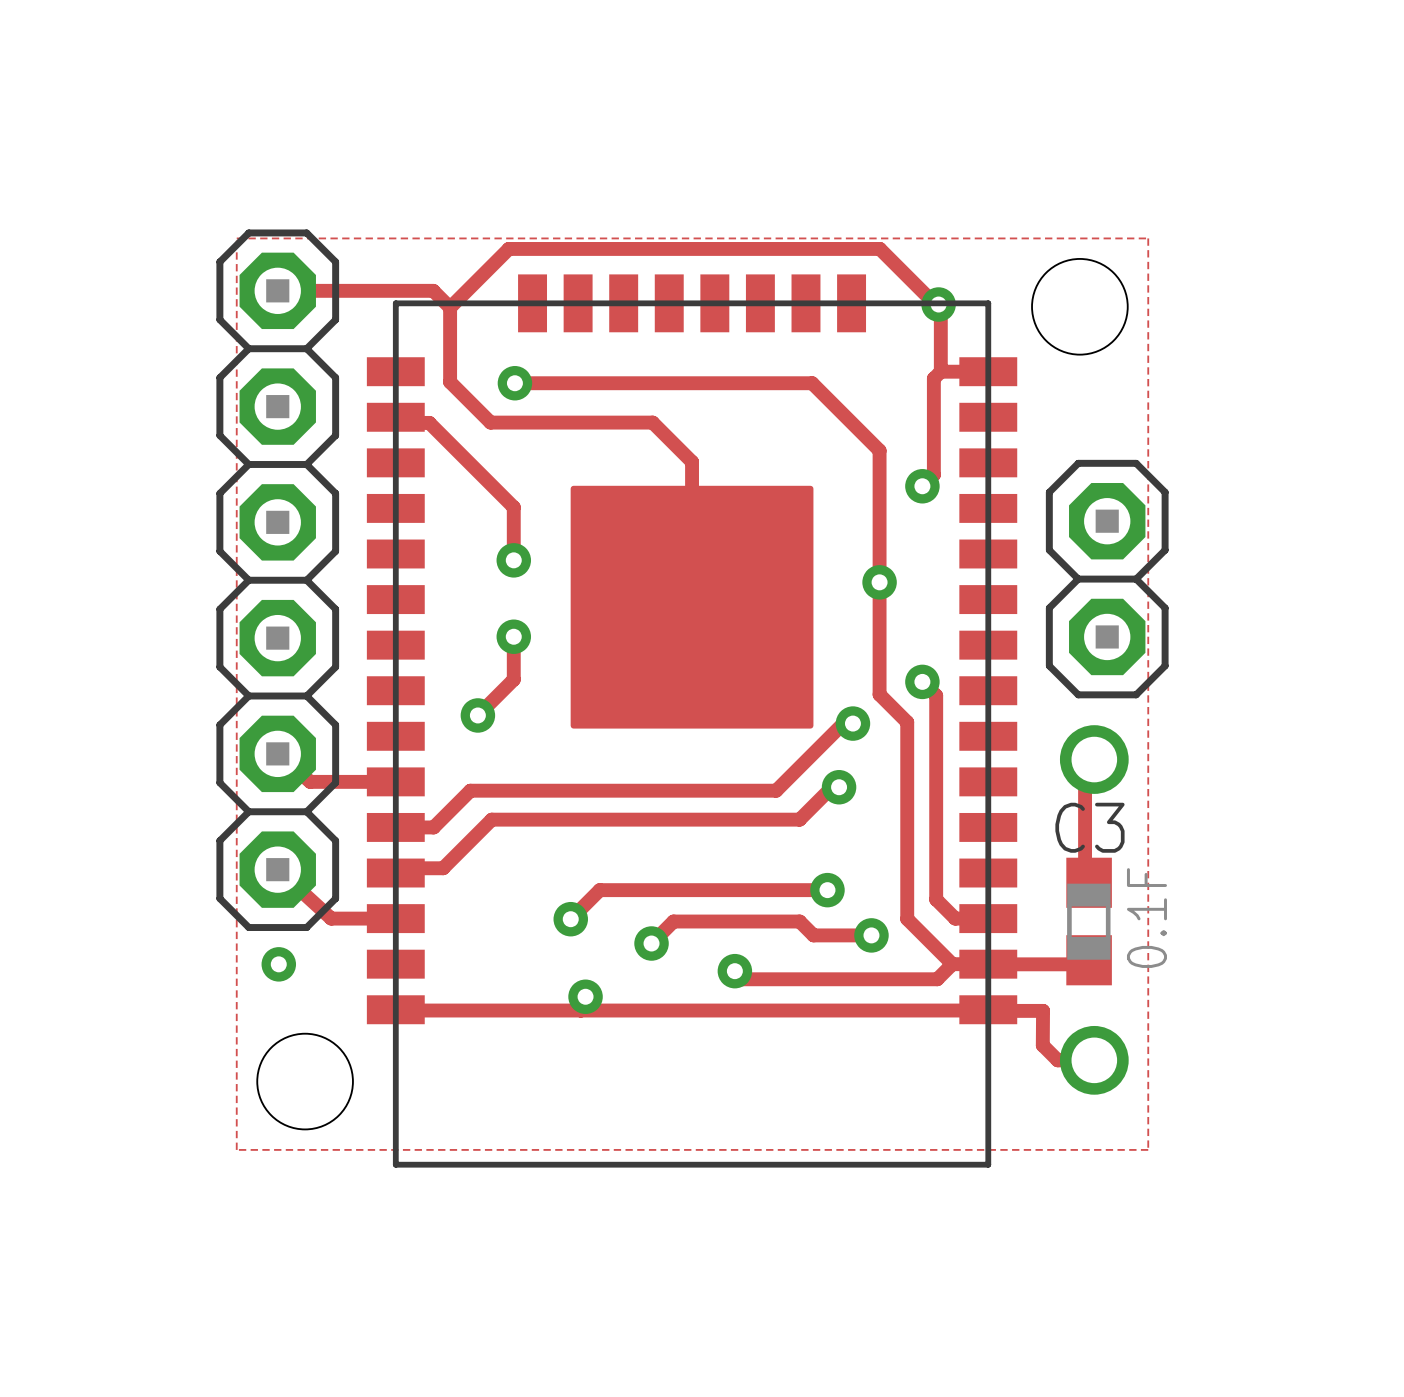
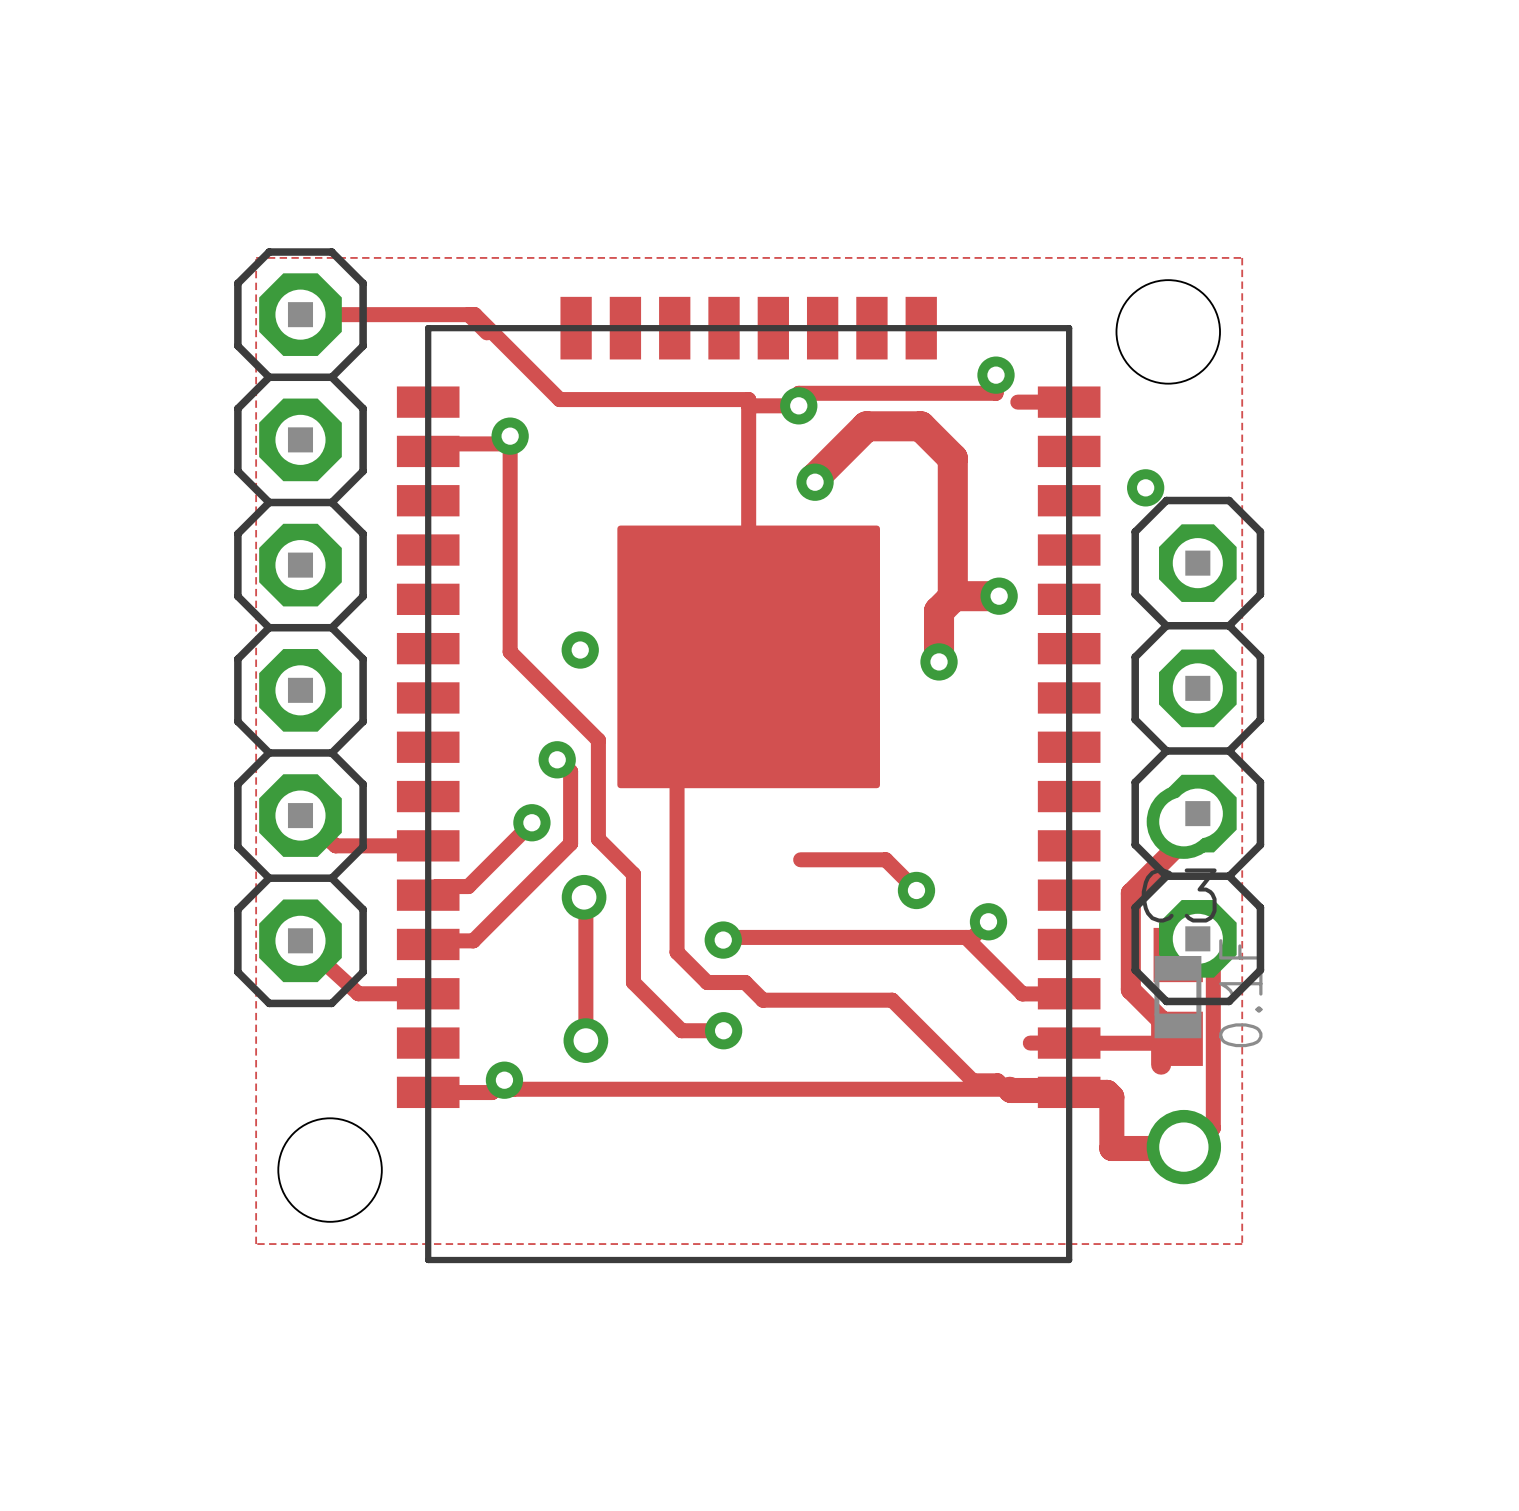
via position: (938, 304) -> (996, 375)
track: none -> (996, 375) (996, 393) (798, 393) (798, 405) (748, 405)
via: none -> (798, 405)
track: (514, 383) (812, 383) (879, 450) (879, 694) (907, 722) (907, 919) (952, 964) (937, 979) (742, 979) (734, 971) -> none
via position: (514, 383) -> (510, 436)
track: (395, 417) (401, 423) (429, 422) (513, 507) (513, 560) -> (428, 451) (435, 443) (502, 443) (510, 436) (510, 651) (598, 740) (598, 839) (633, 874) (633, 982) (681, 1030) (723, 1030)
track: none -> (815, 482) (815, 477) (866, 426) (920, 426) (952, 458) (952, 596) (999, 596)
via: none -> (815, 482)
via: none -> (1145, 487)
track: (692, 461) (652, 422) (490, 422) (450, 382) (450, 307) (508, 248) (879, 248) (935, 304) (940, 306) (940, 371) (933, 378) (933, 474) (922, 486) -> (748, 499) (748, 399) (559, 399) (474, 314) (468, 314)
via: (922, 486) -> none
track: none -> (954, 596) (939, 611) (939, 661)
via: none -> (999, 596)
via: (513, 560) -> none
part: (1107, 579) -> none
via position: (879, 582) -> (939, 661)
via: none -> (580, 650)
track: (513, 636) (513, 679) (477, 715) -> none
via: (513, 636) -> none
track: (922, 681) (936, 695) (936, 899) (955, 918) (988, 918) -> (965, 937) (1022, 993) (1069, 993)
via: (922, 681) -> none
part: none -> (1197, 750)
track: none -> (686, 752) (677, 761) (677, 952) (707, 982) (745, 982) (762, 1000) (892, 1000) (972, 1080) (997, 1080) (998, 1083)
via: none -> (557, 759)
via: (477, 715) -> none
track: (852, 723) (843, 723) (776, 790) (470, 790) (433, 827) (395, 827) -> (531, 822) (468, 886) (436, 886) (428, 895)
via: (852, 723) -> none
track: none -> (1197, 813) (1197, 826) (1130, 893) (1130, 989) (1161, 1020) (1161, 1064) (1164, 1061)
track: (1094, 759) (1085, 768) (1085, 878) (1089, 882) -> none
via: none -> (531, 822)
track: (839, 787) (832, 787) (799, 819) (491, 819) (443, 868) (401, 868) (395, 873) -> (557, 759) (570, 771) (570, 843) (473, 940) (431, 940) (428, 944)
via: (839, 787) -> none
track: none -> (800, 859) (885, 859) (916, 890)
via: none -> (916, 890)
track: none -> (584, 897) (585, 897) (585, 1040)
via: none -> (584, 897)
track: none -> (988, 921) (972, 937) (727, 937) (723, 940)
via: none -> (988, 921)
track: none -> (1197, 938) (1213, 954) (1213, 1128) (1193, 1148) (1111, 1148) (1111, 1097) (1107, 1092) (1009, 1089) (513, 1089) (504, 1080) (492, 1092) (428, 1092)
via: none -> (723, 940)
track: (827, 890) (599, 890) (570, 919) -> none
via: (827, 890) -> none
via: (570, 919) -> none
track: (871, 935) (813, 935) (799, 921) (673, 921) (651, 943) -> none
via: (871, 935) -> none
via position: (651, 943) -> (723, 1030)
via: none -> (585, 1040)
via: (278, 964) -> none
via: (734, 971) -> none
via: (585, 996) -> none
via: none -> (504, 1080)
track: (390, 1009) (1043, 1010) (1042, 1045) (1057, 1060) (1094, 1060) -> none

